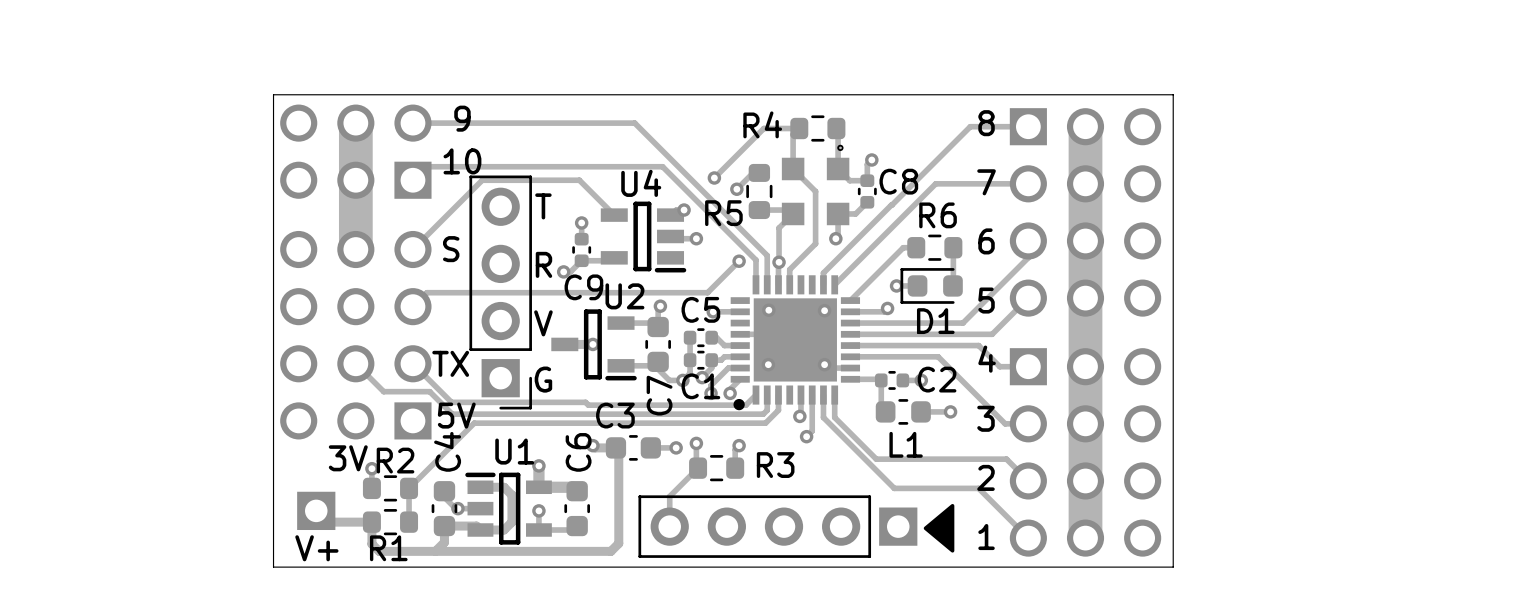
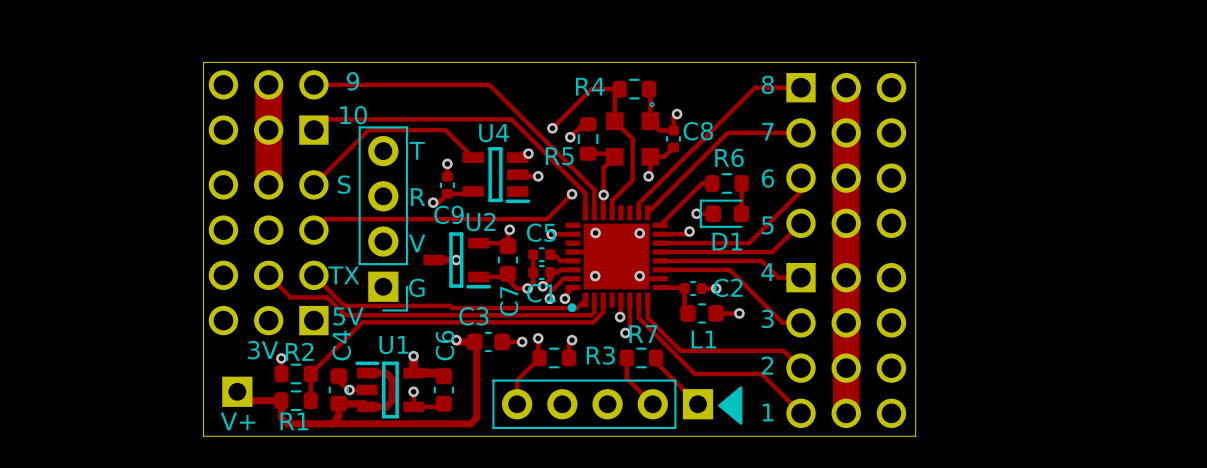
track: none -> (626, 357) (626, 378) (652, 404)
R7: none -> (641, 357)
track: none -> (656, 357) (656, 362) (698, 404)

